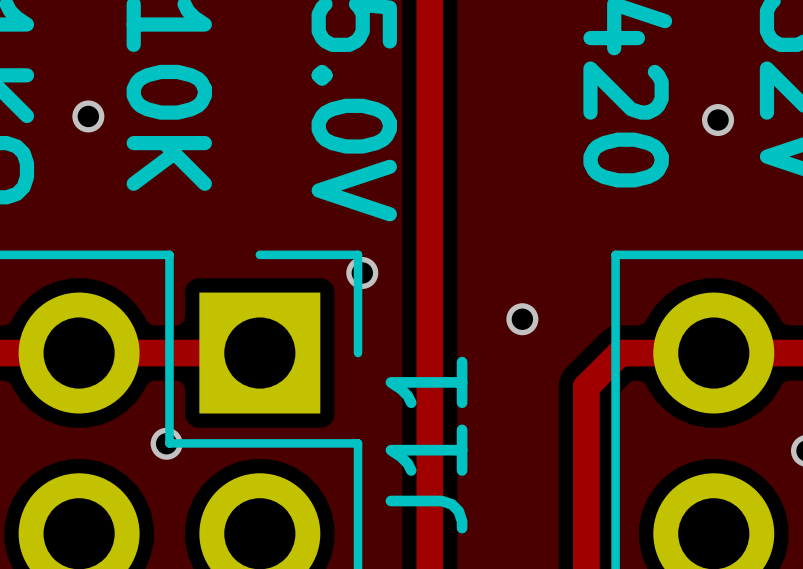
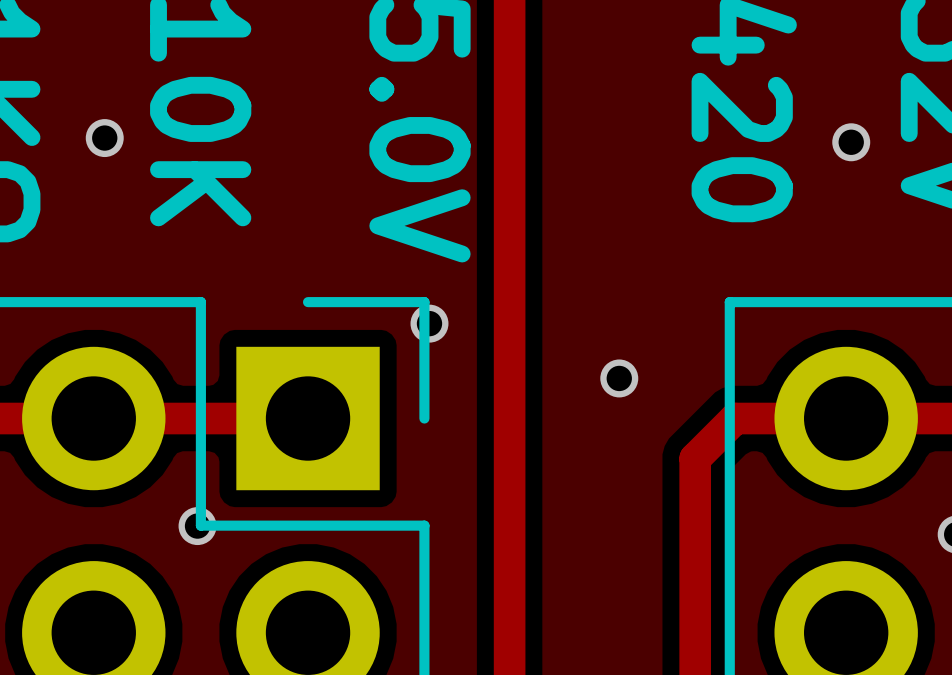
J11 name: J11 (426, 445) -> none

